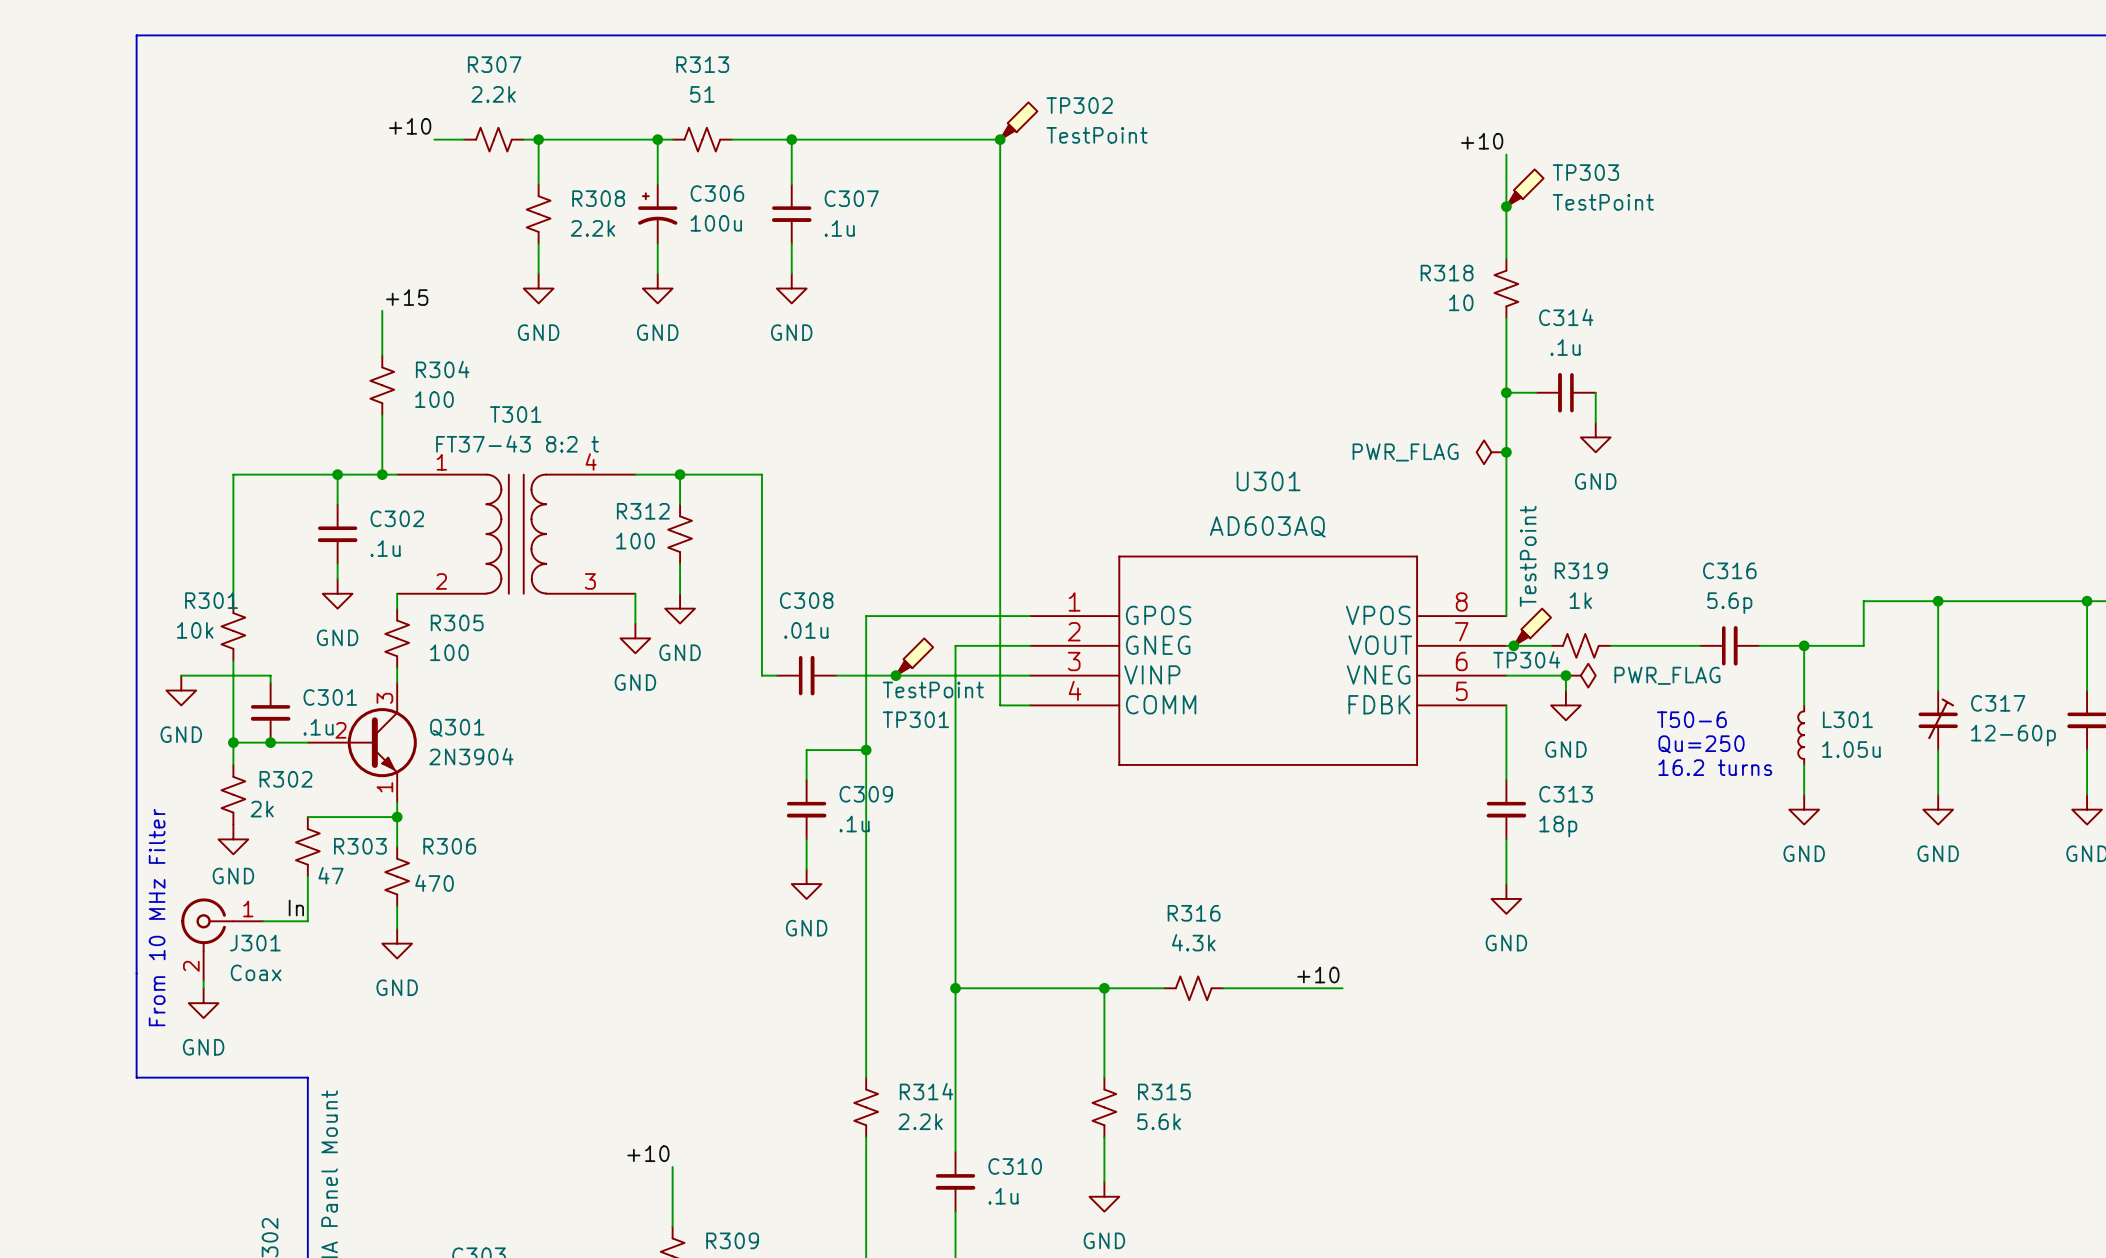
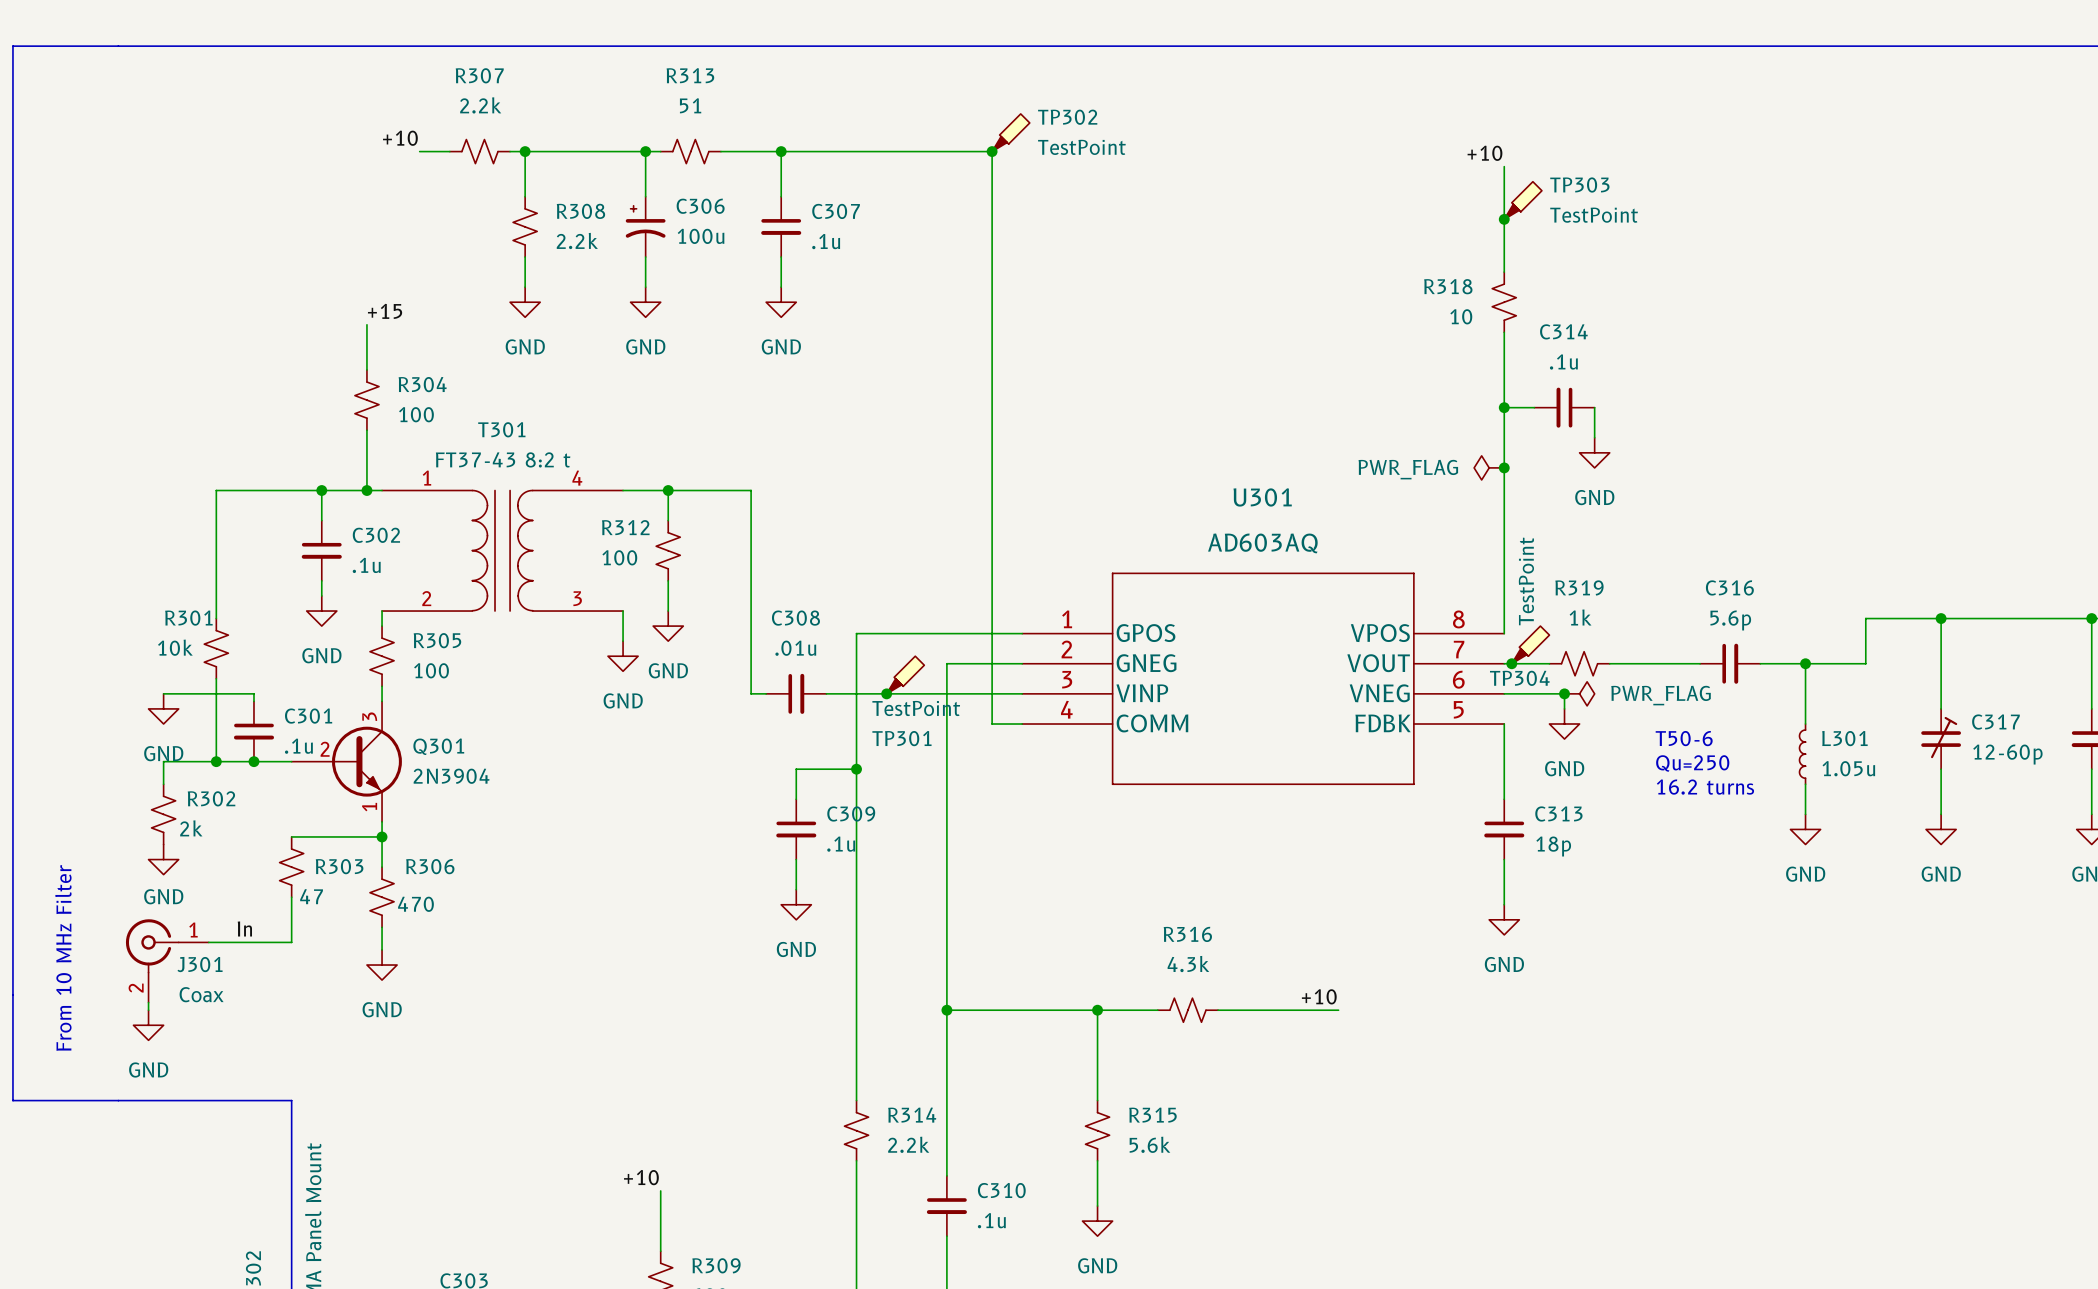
line: (136, 35) (136, 1077) -> (118, 46) (12, 46) (12, 1100) (118, 1100)
wire: (233, 742) (233, 764) -> (216, 761) (163, 761) (163, 784)
R302 position: (233, 794) -> (163, 814)
power symbol position: GND (233, 839) -> GND (163, 859)
label position: In (296, 908) -> In (244, 928)
text position: From 10 MHz Filter (157, 917) -> From 10 MHz Filter (63, 957)
J301 position: (222, 939) -> (167, 960)
wire: (203, 980) (203, 988) -> (148, 1002) (148, 1010)
power symbol position: GND (203, 1003) -> GND (148, 1025)

